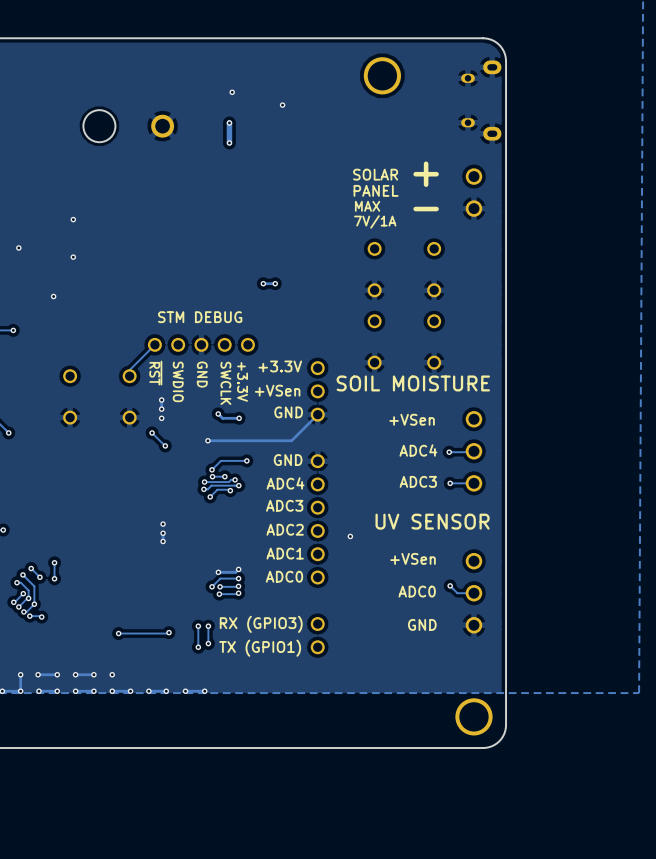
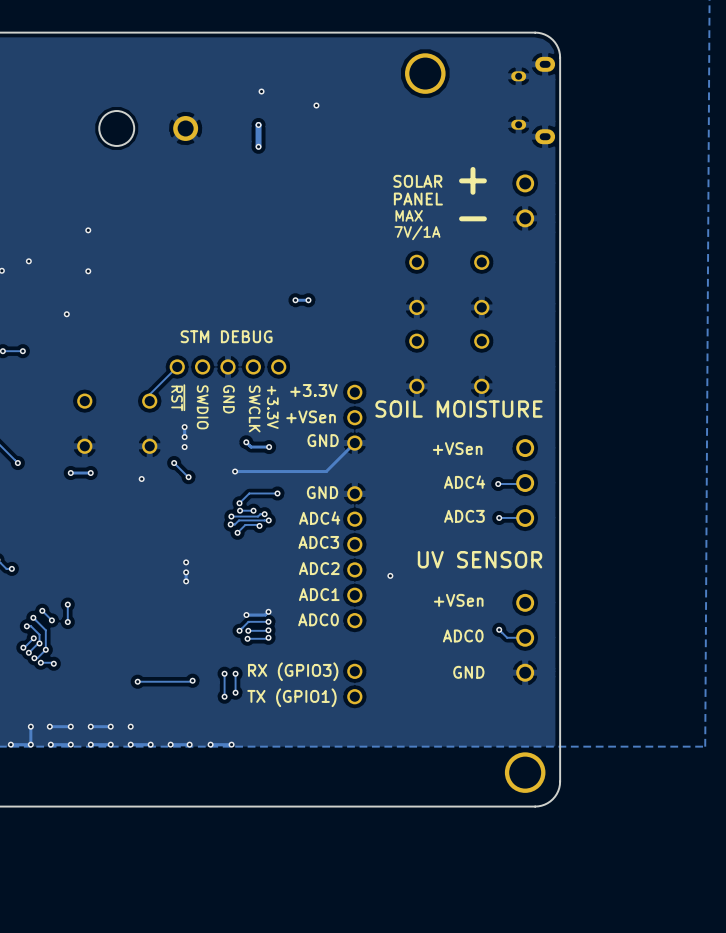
via: none -> (70, 473)
track: none -> (90, 473) (70, 473)
via: none -> (90, 473)
via: none -> (141, 479)

